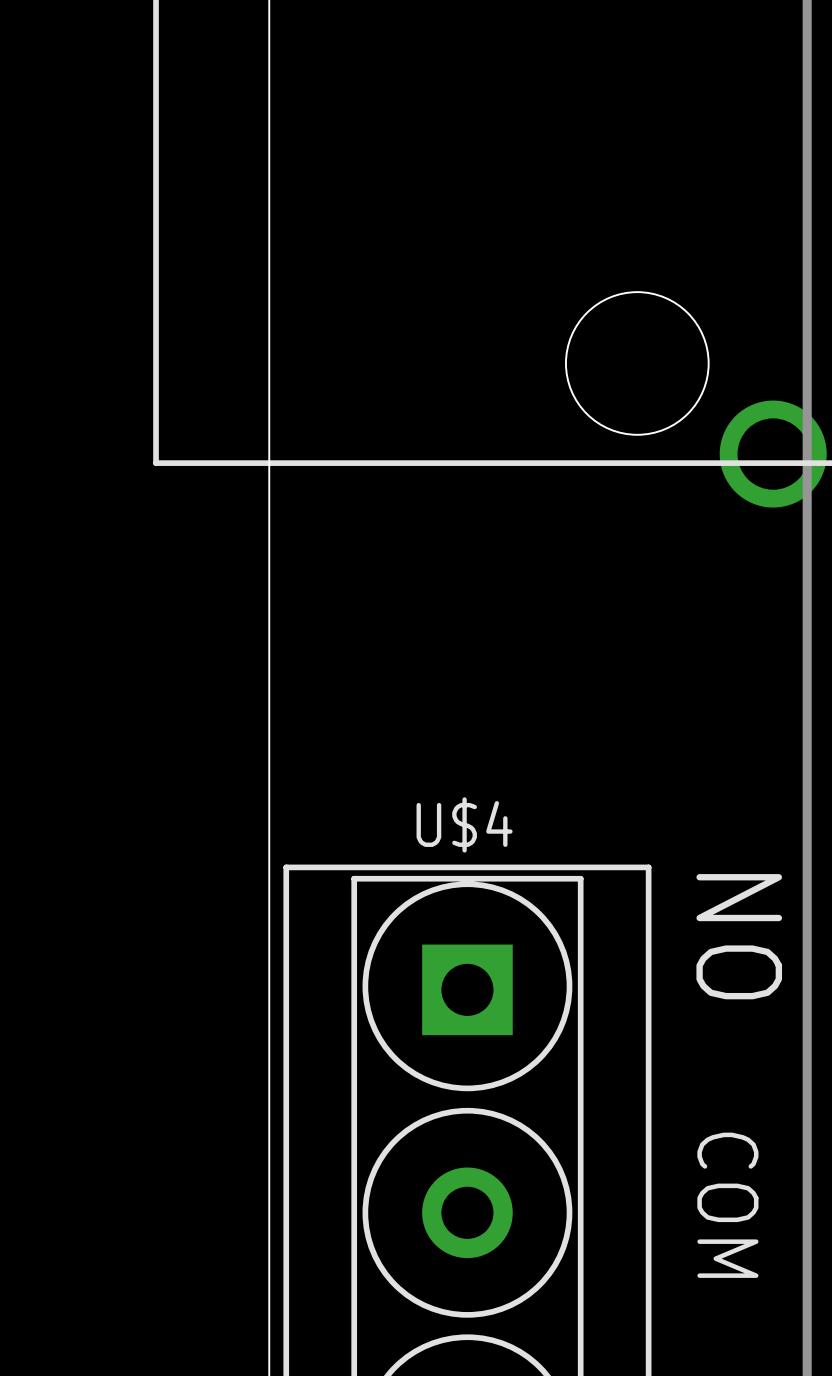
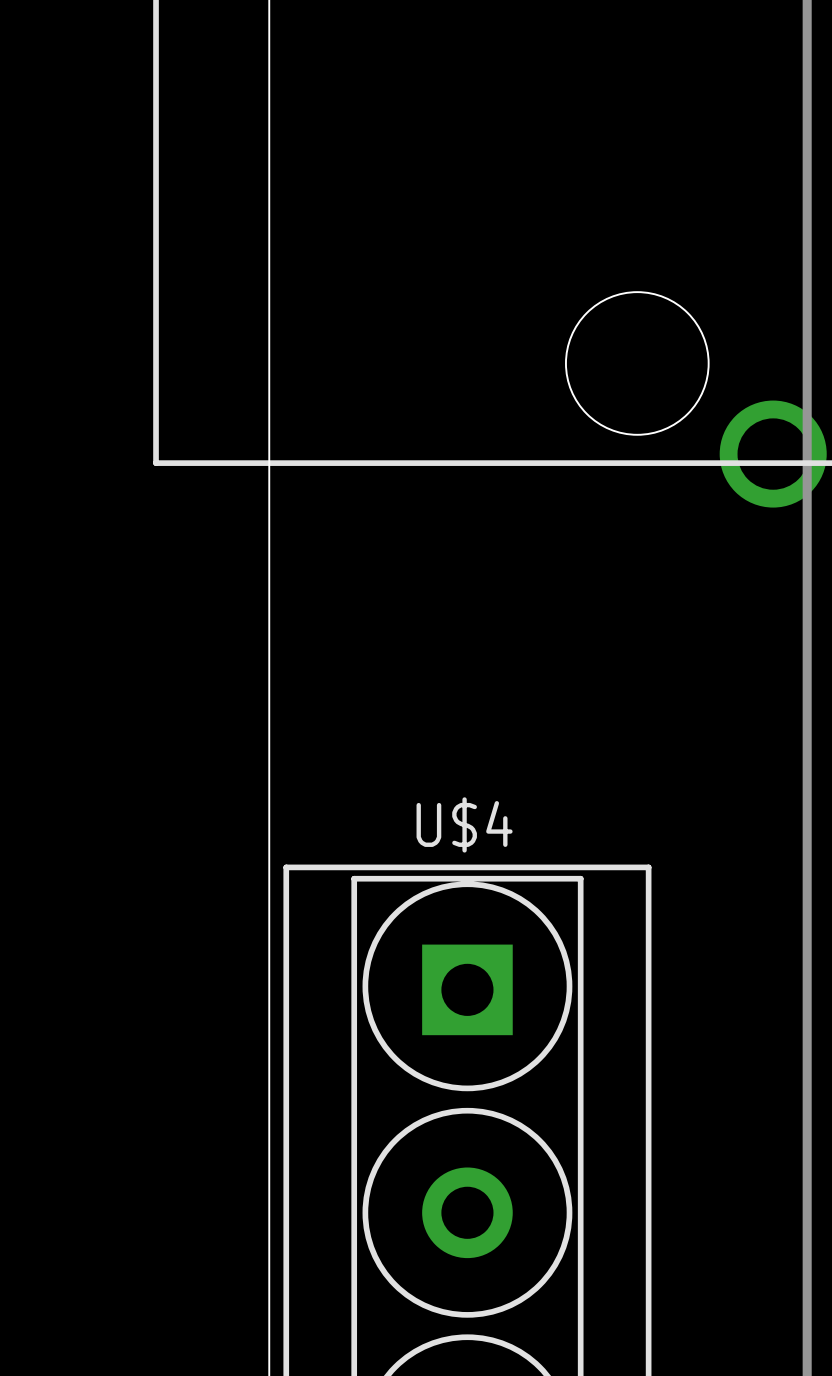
text: NO (739, 936) -> none
text: COM (727, 1205) -> none

